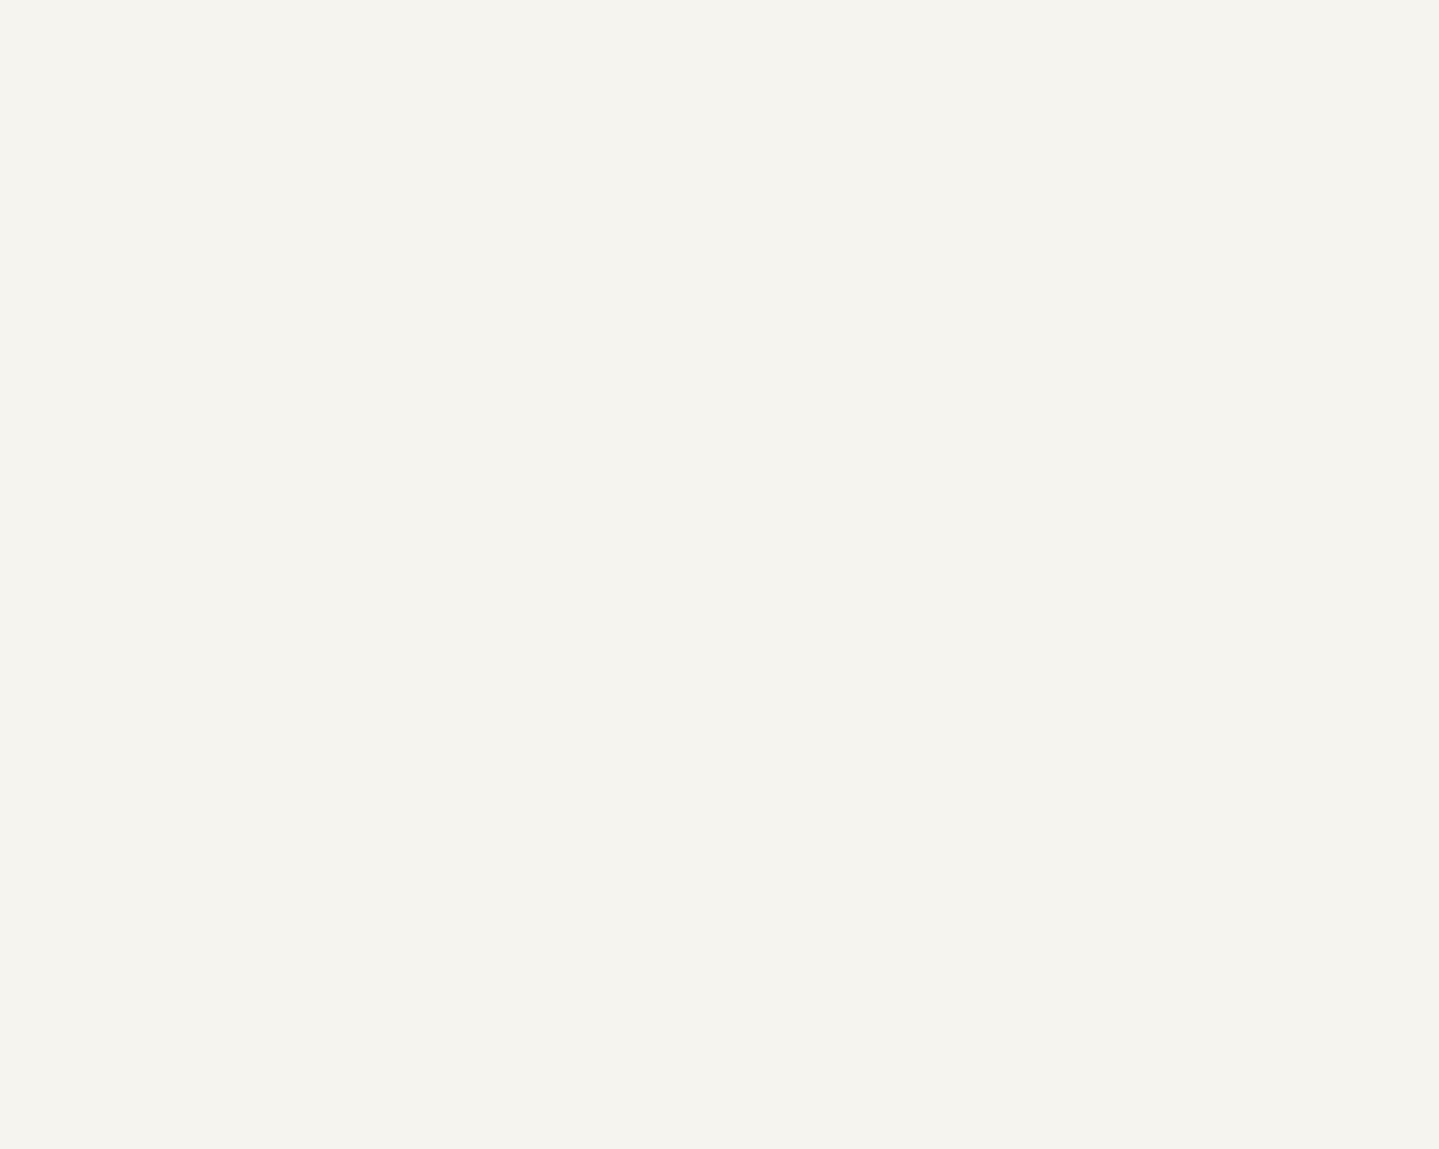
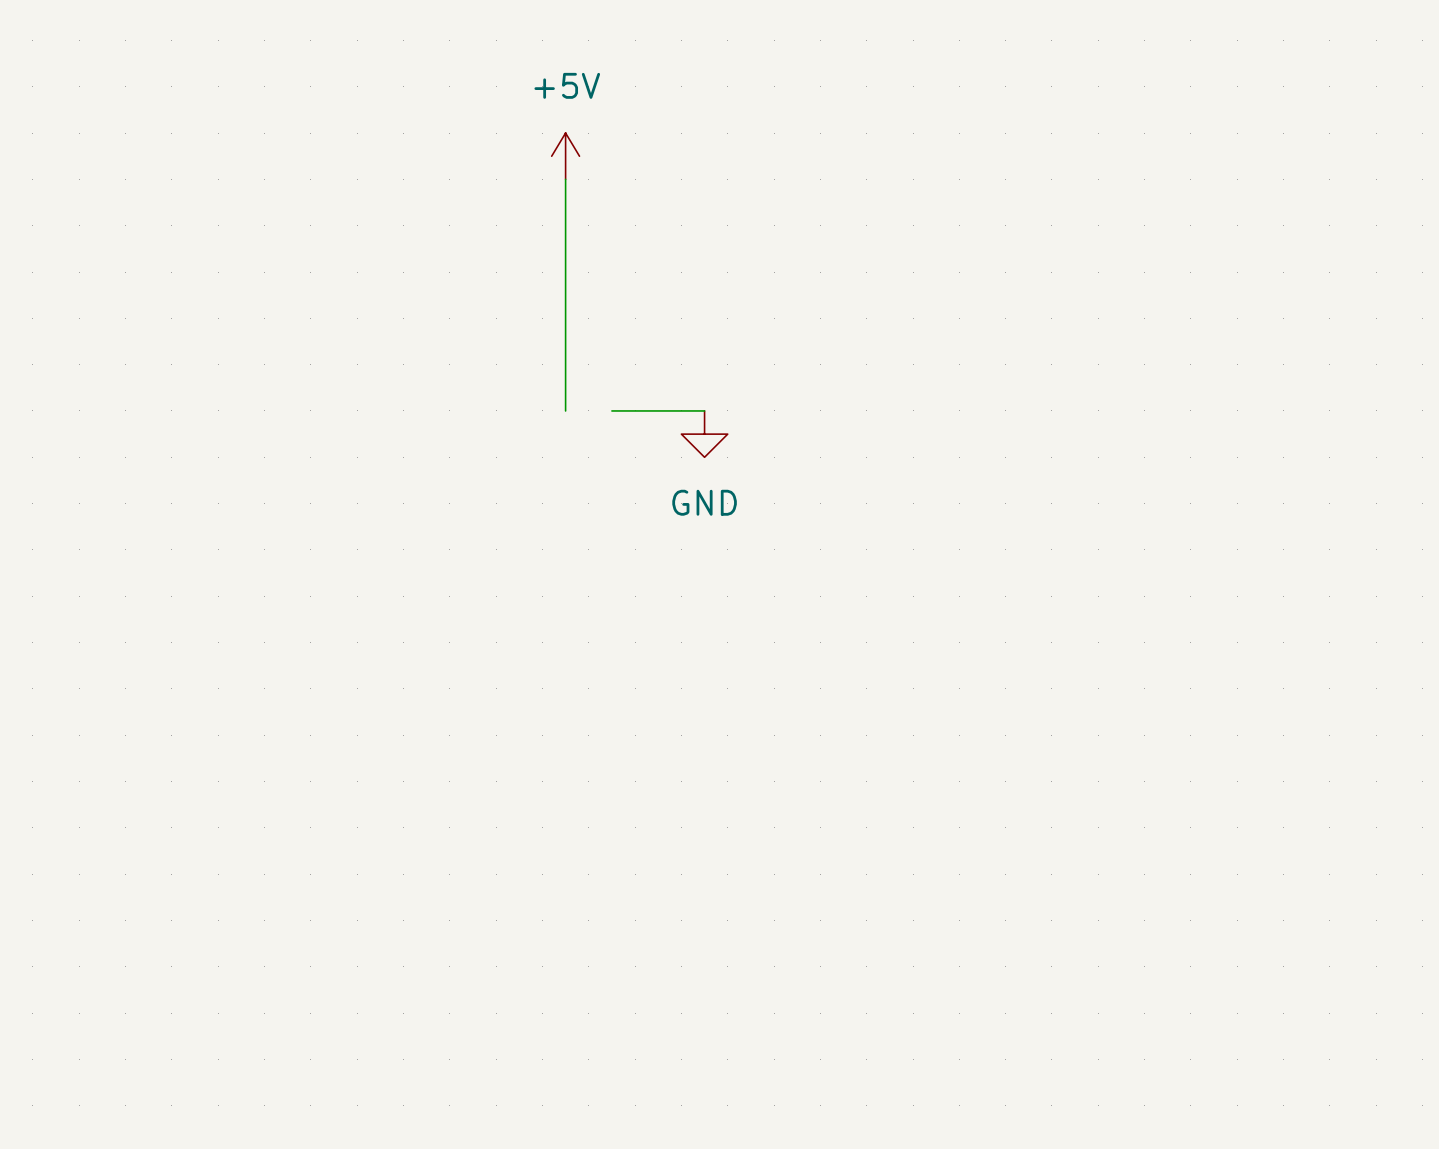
power symbol: none -> +5V (565, 156)
wire: none -> (565, 179) (565, 410)
wire: none -> (611, 410) (704, 410)
power symbol: none -> GND (704, 434)

